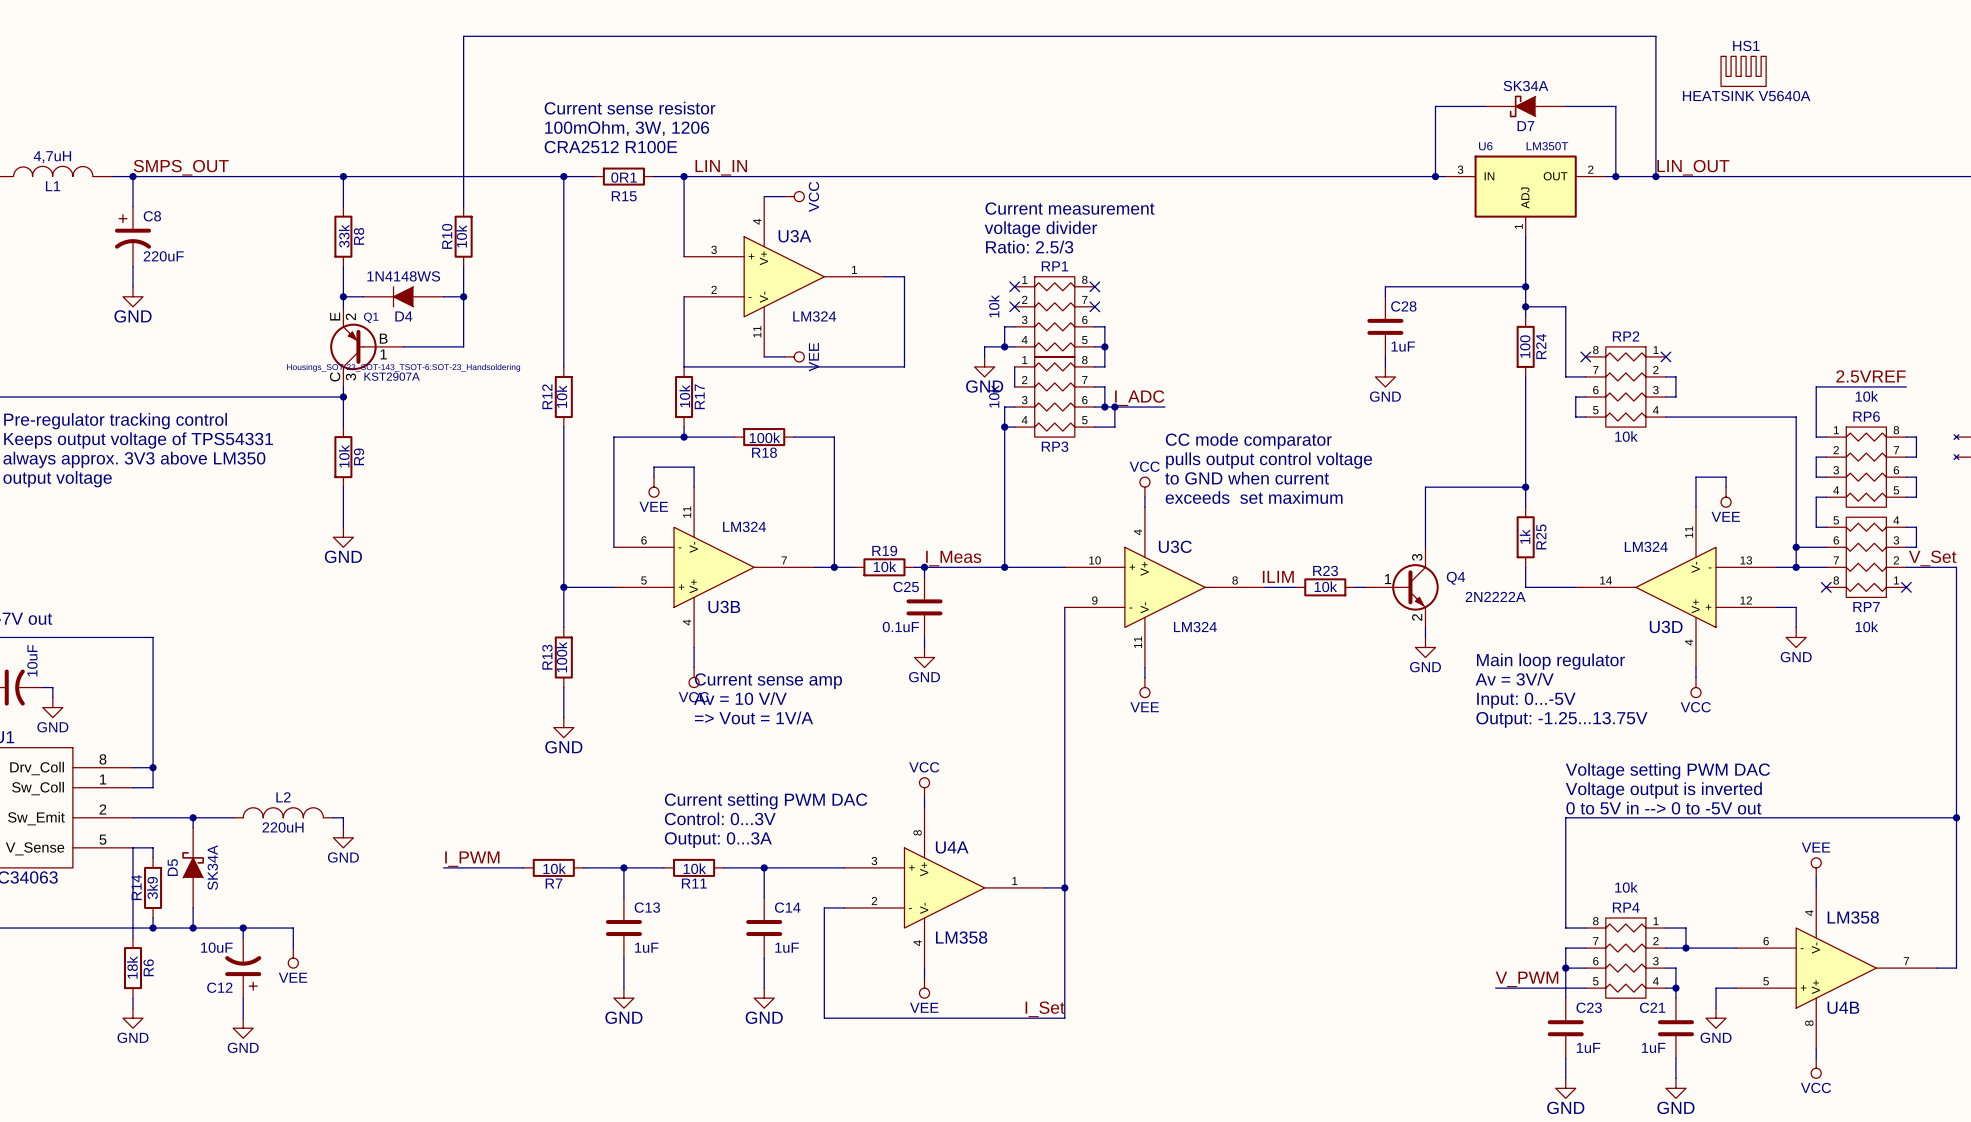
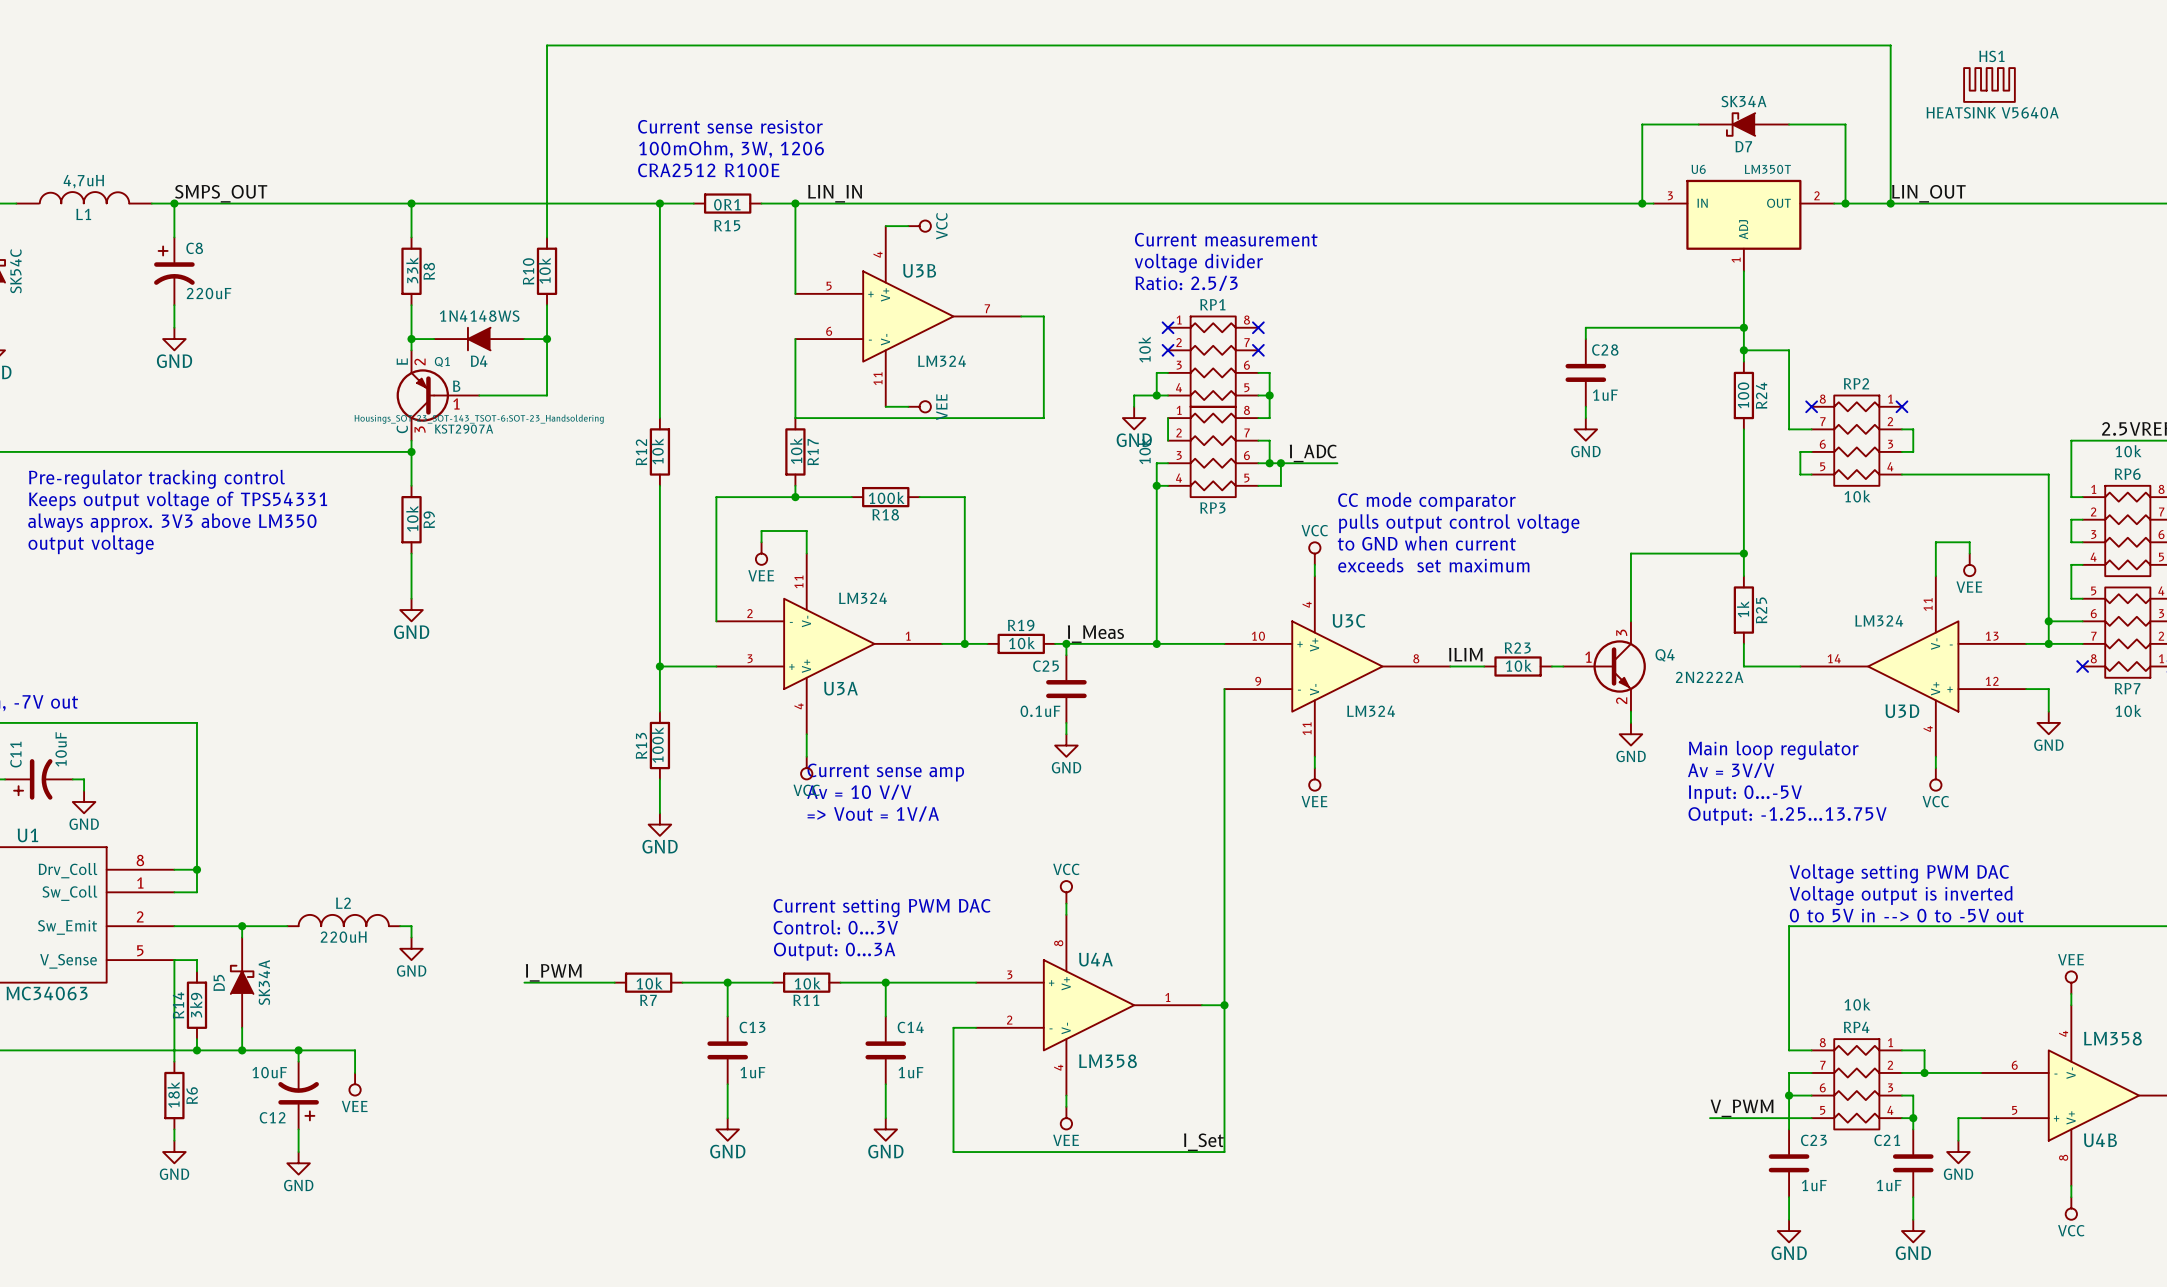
U3A flip: as is (784, 276) -> up-down (829, 643)
U3A position: (784, 276) -> (829, 643)
U3B flip: as is (714, 567) -> up-down (908, 316)
U3B position: (714, 567) -> (908, 316)

